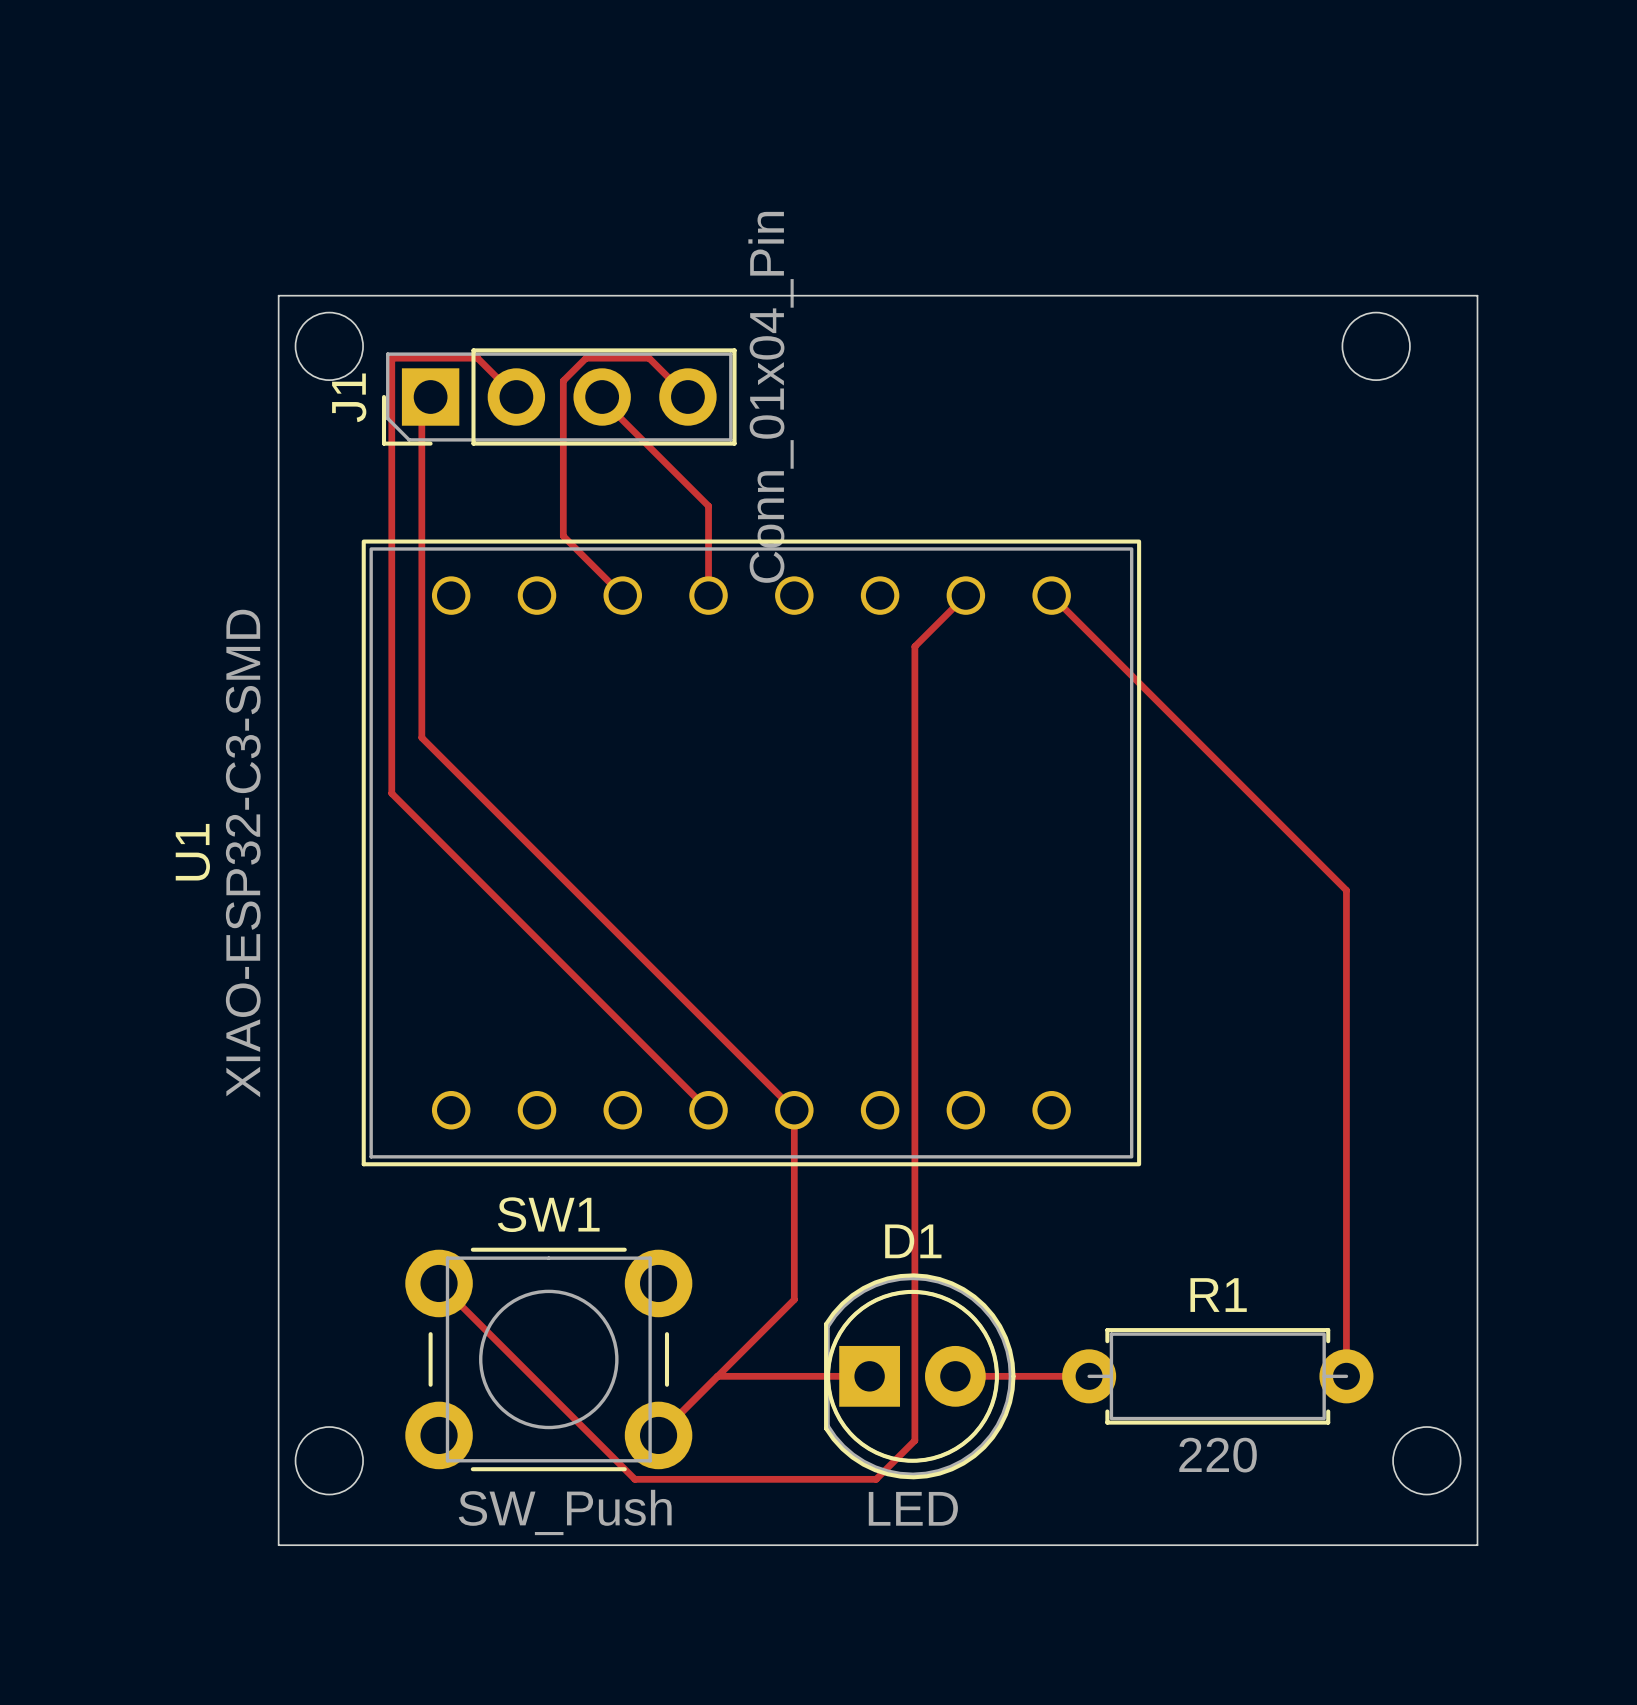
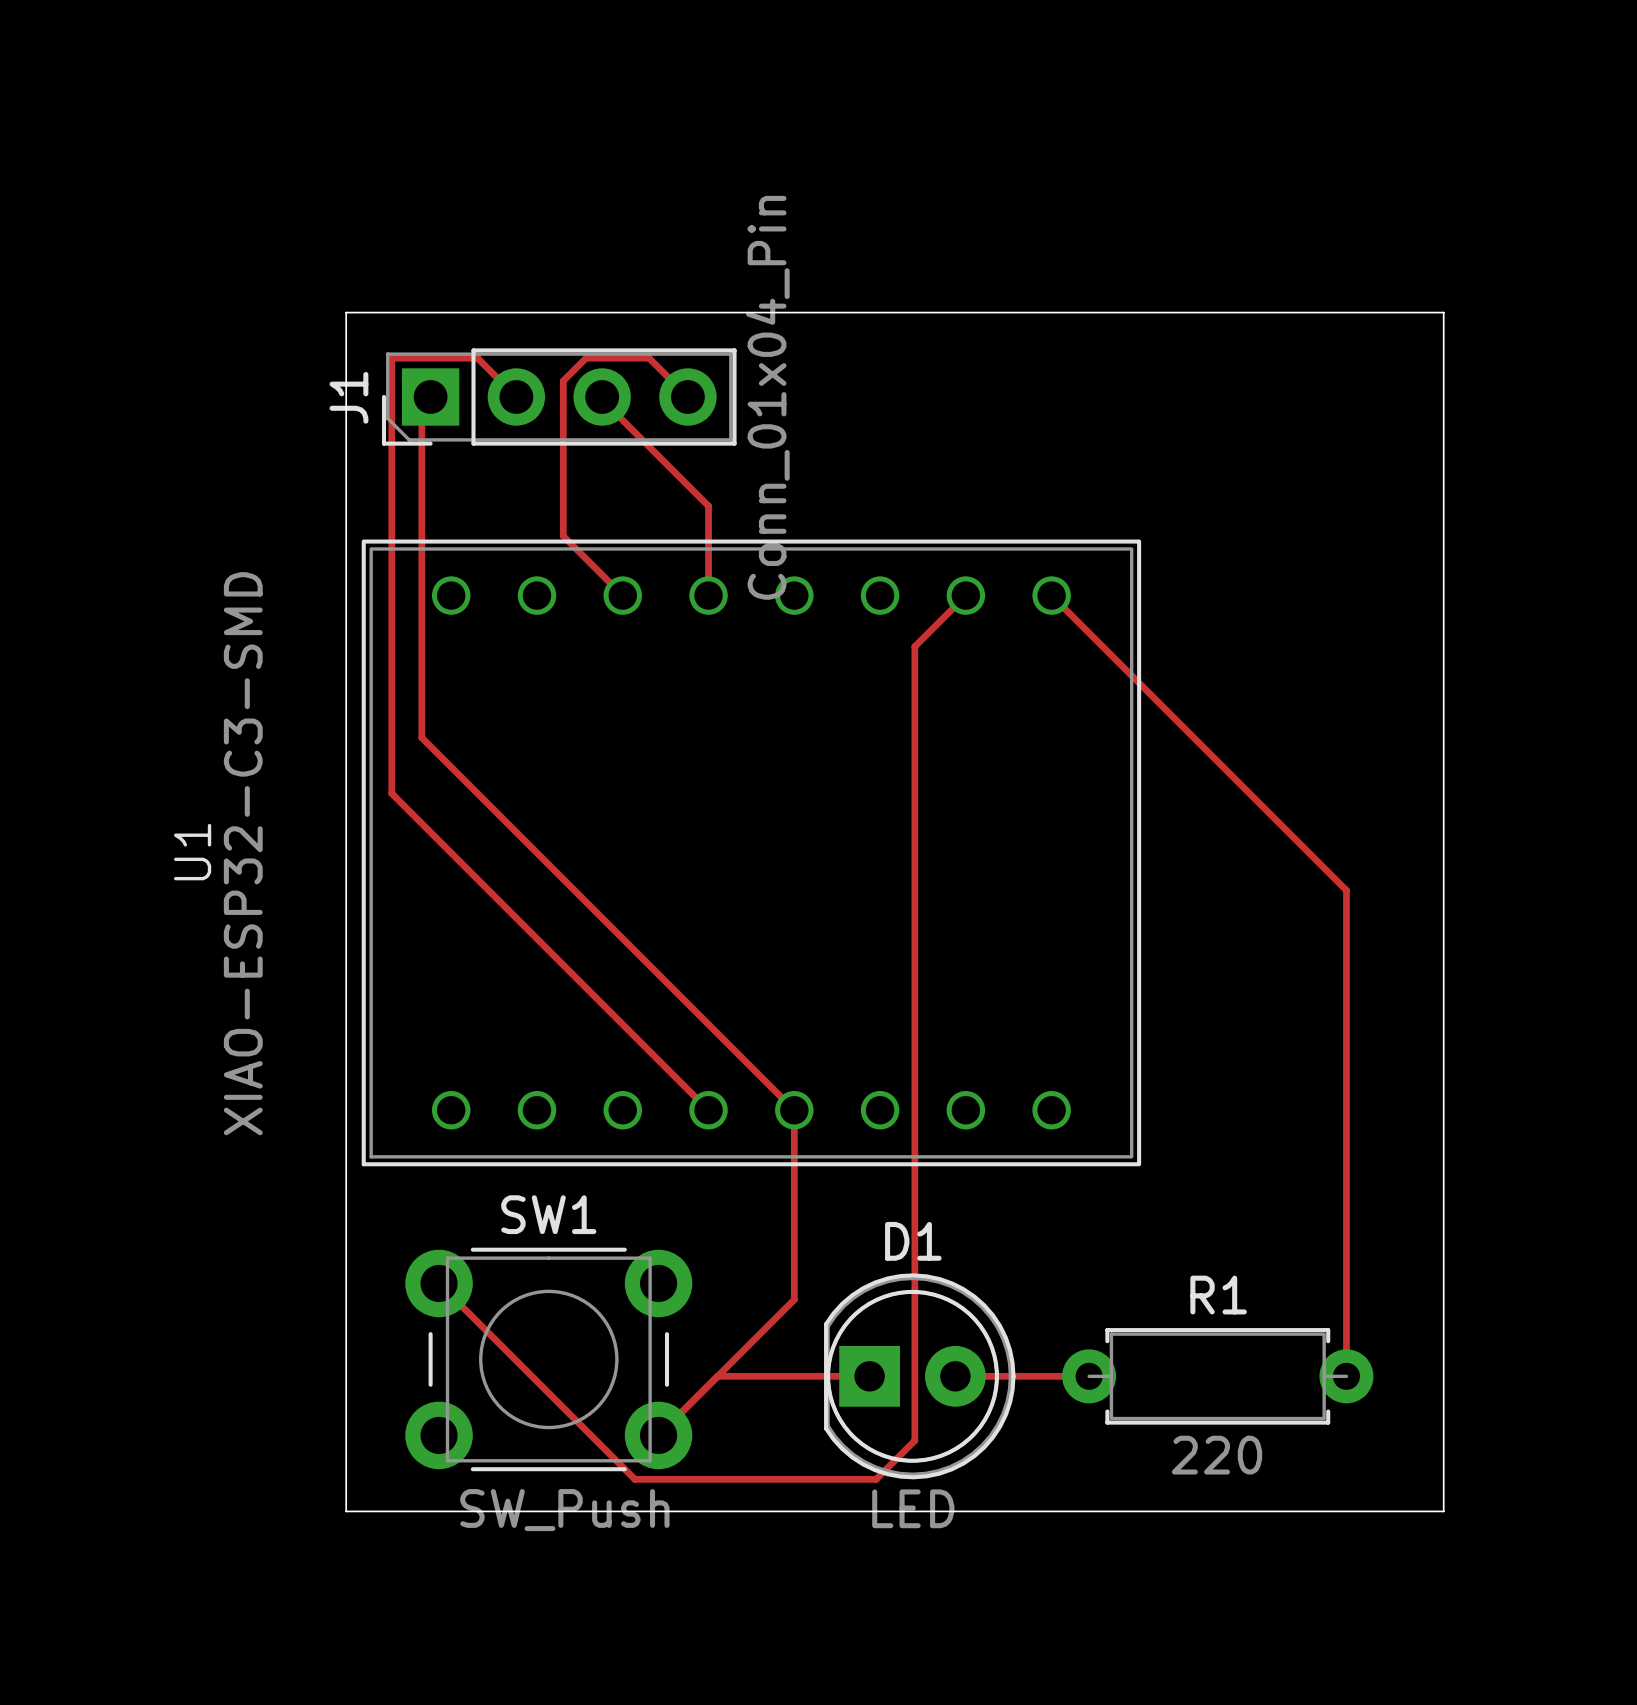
board edge: (278, 295) (1477, 295) (1477, 1545) (278, 1545) (278, 295) -> (346, 312) (346, 1511) (1443, 1511) (1443, 312) (346, 312)
round board edge: [294, 311, 364, 381] -> none
round board edge: [1341, 311, 1411, 381] -> none
round board edge: [294, 1426, 364, 1496] -> none
round board edge: [1392, 1426, 1462, 1496] -> none

